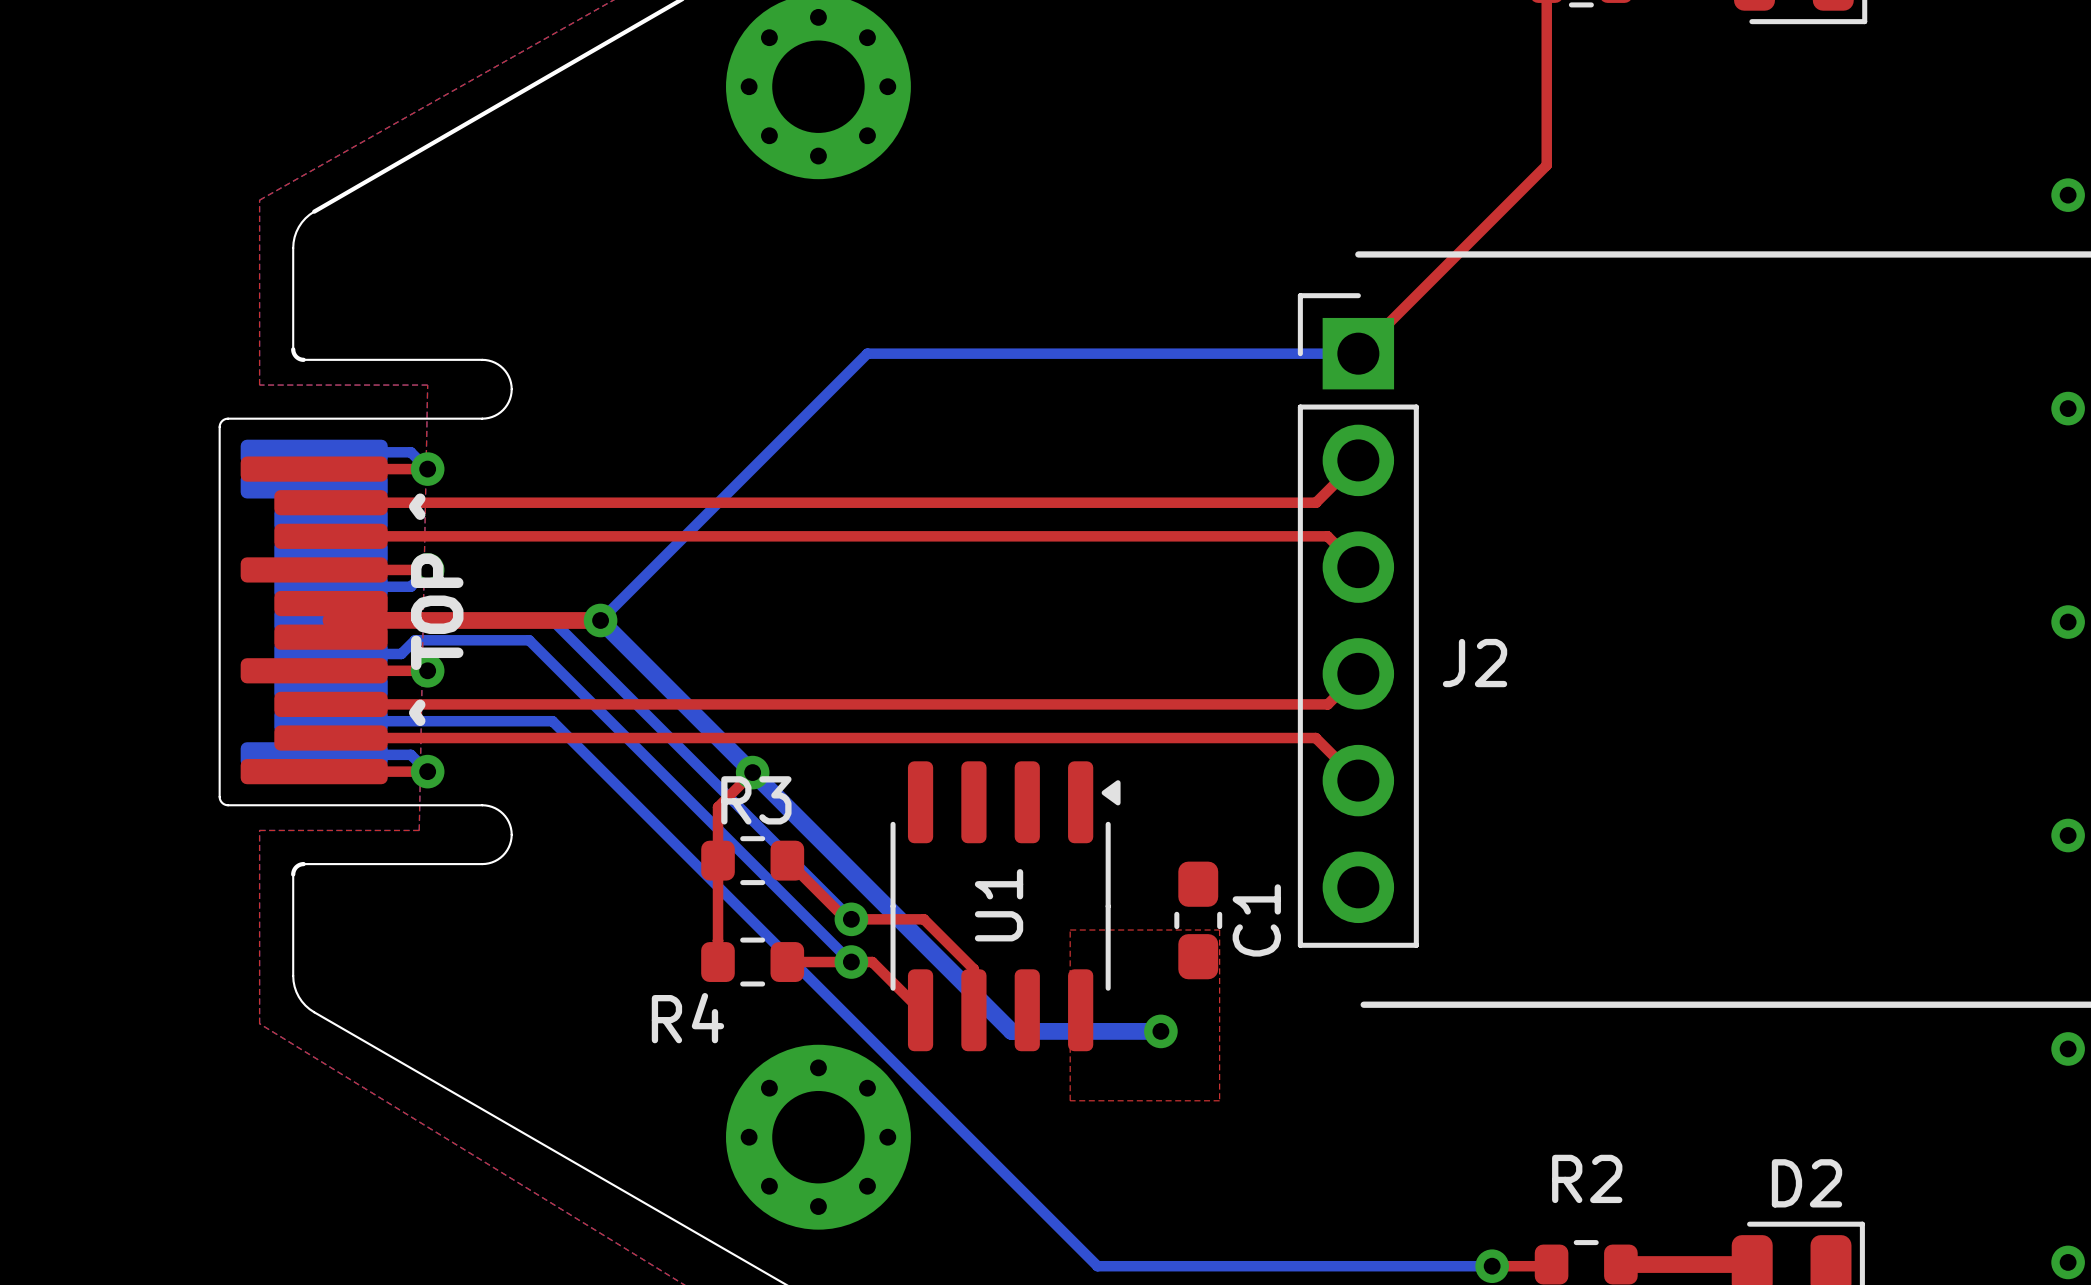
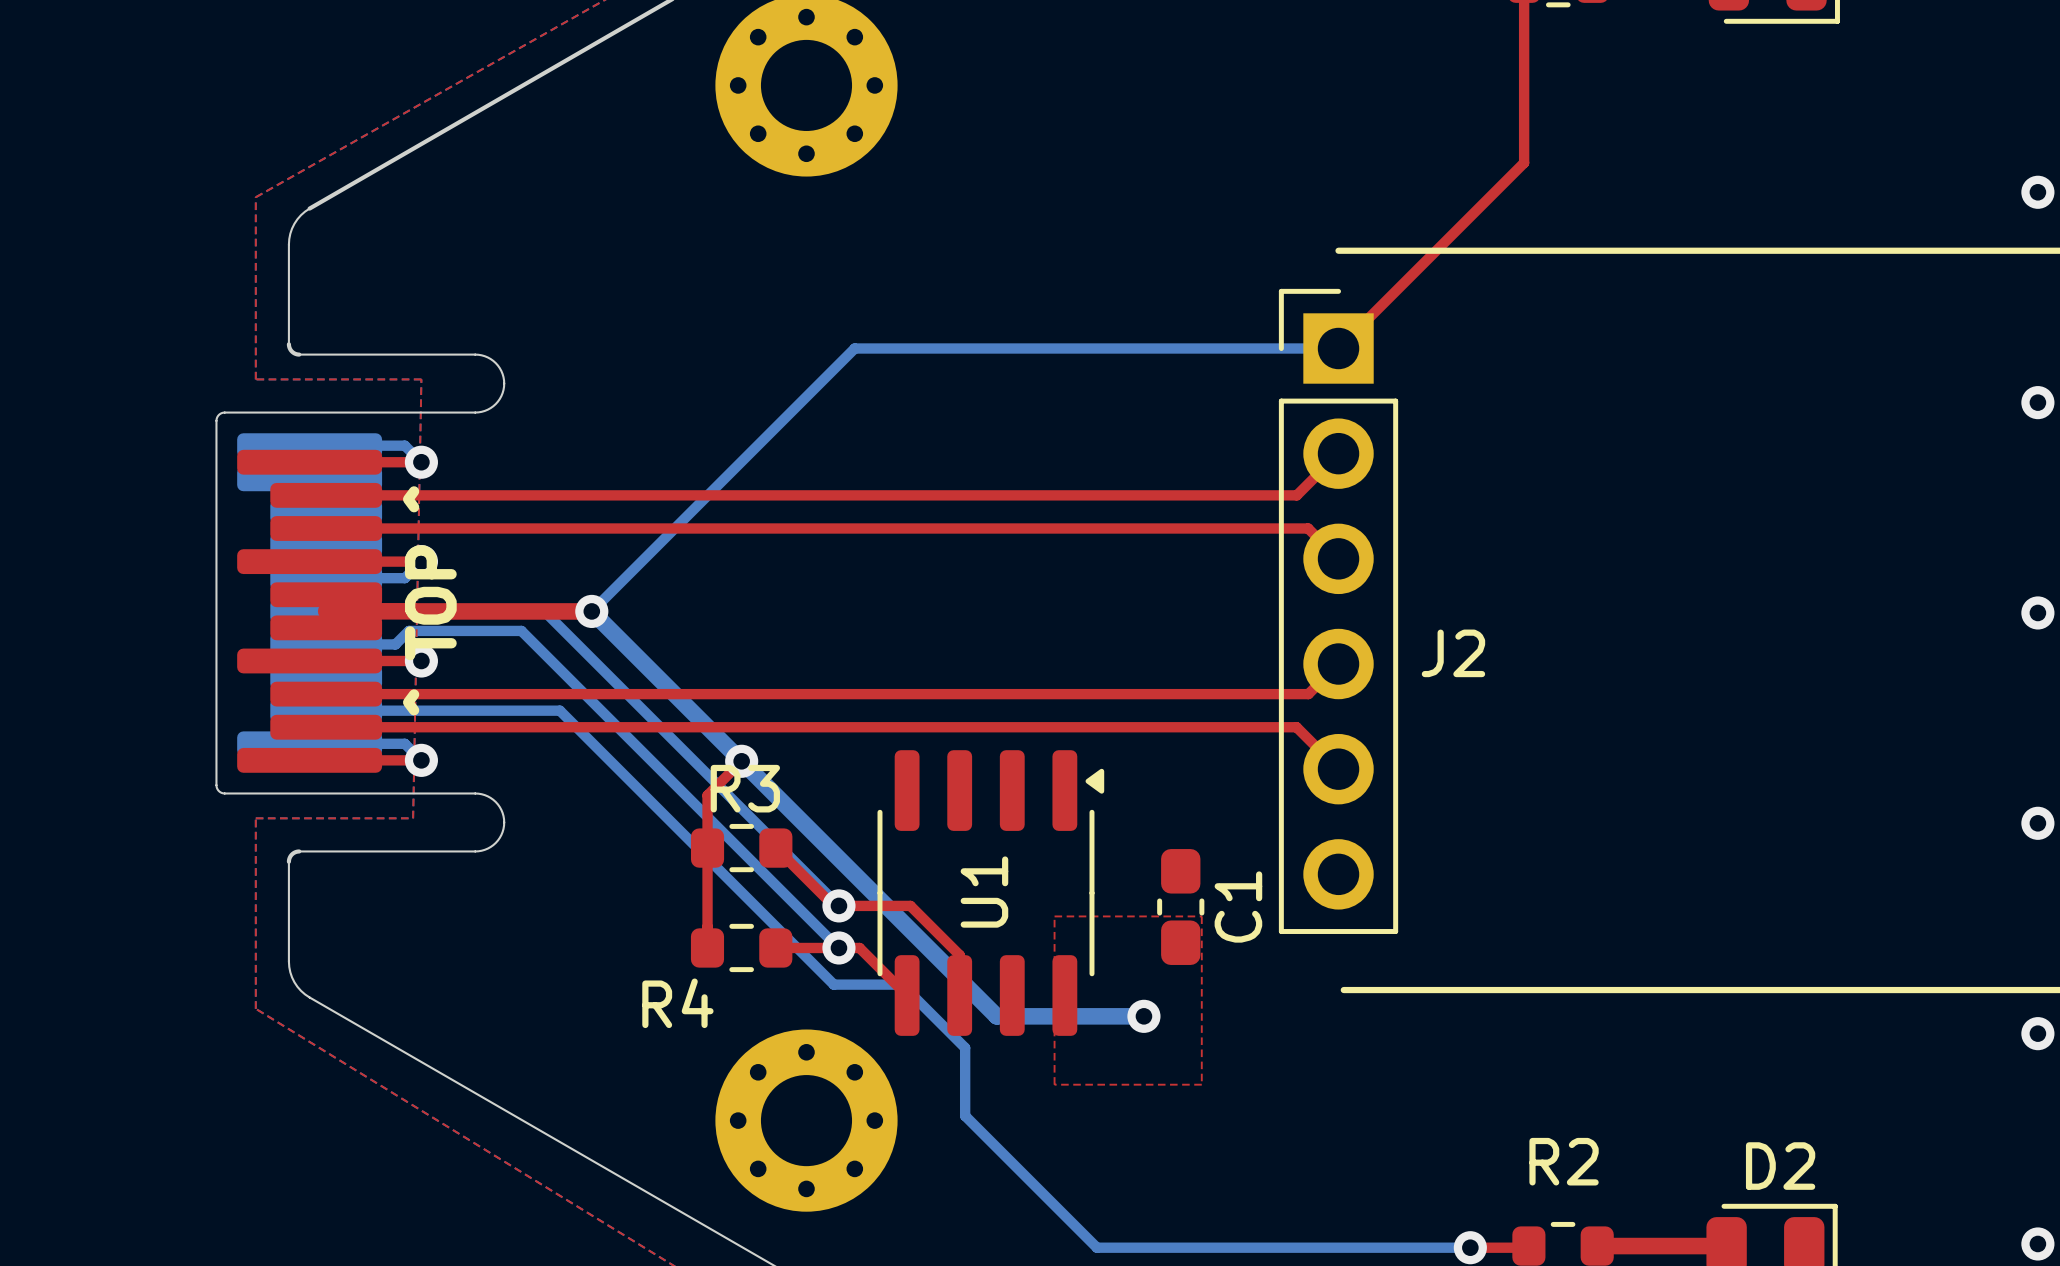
bottom track: (552, 721) (1097, 1266) (1113, 1266) -> (544, 710) (559, 710) (833, 984) (901, 984) (965, 1047) (965, 1115) (1096, 1247)

